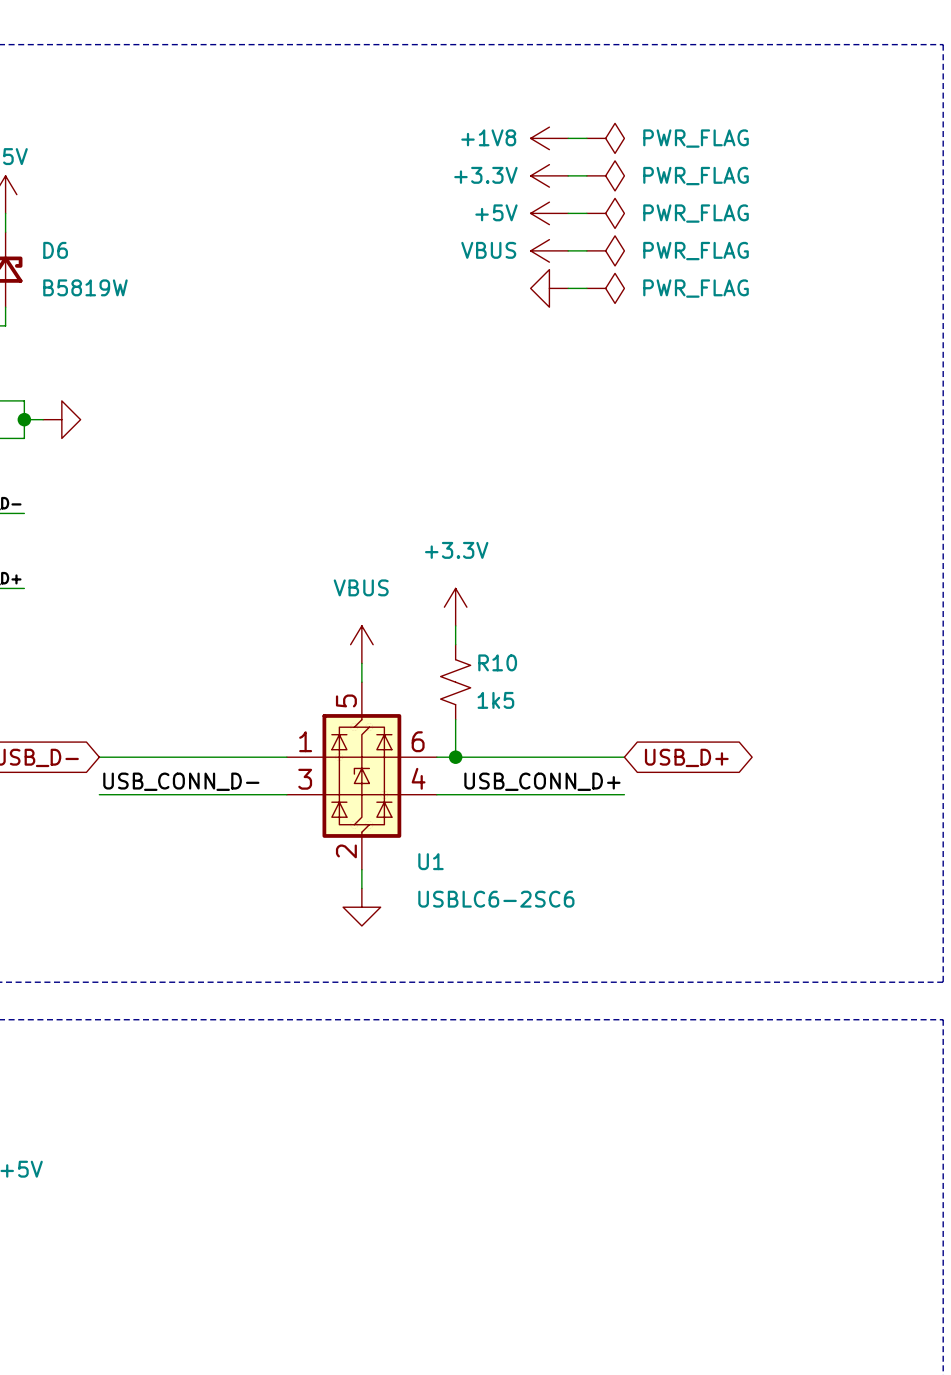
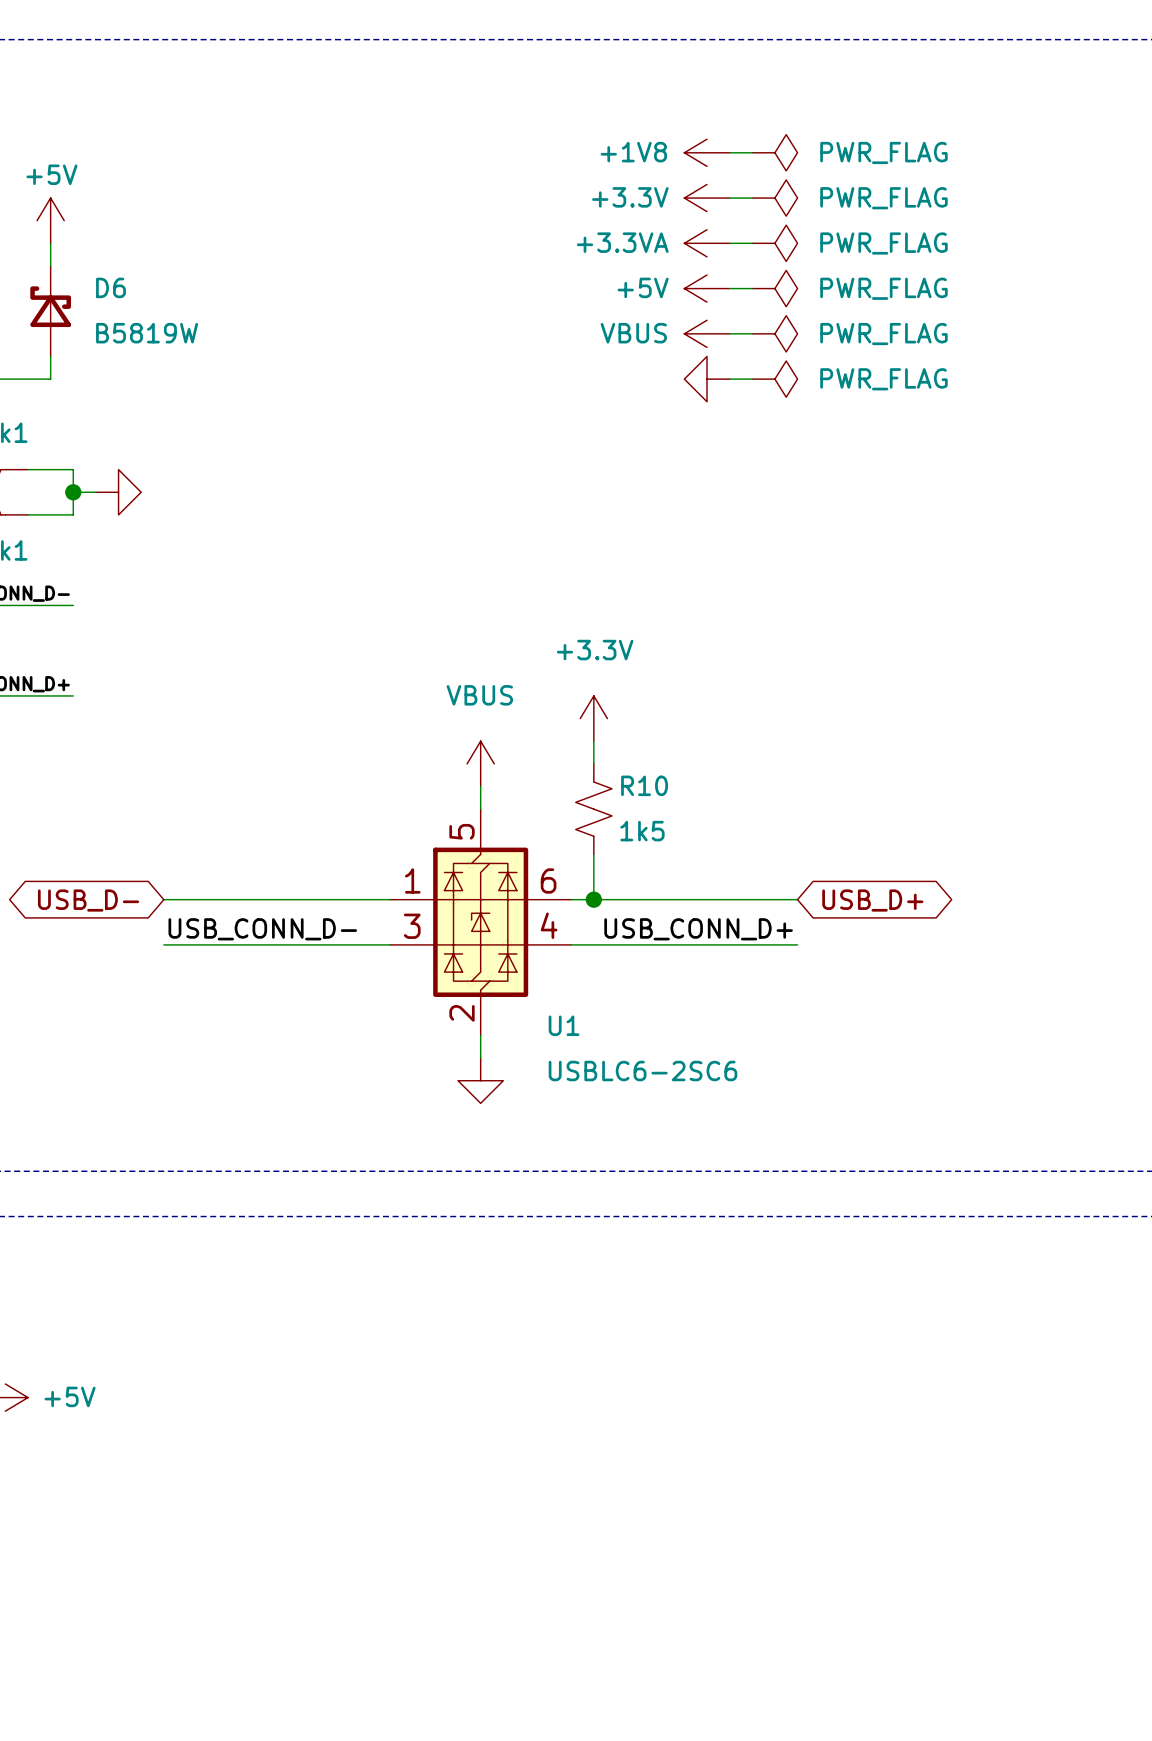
power symbol: +5V (549, 213) -> +3.3VA (707, 243)
power symbol: VBUS (549, 250) -> +5V (707, 288)
power symbol shape: [530, 269, 569, 308] -> [684, 320, 730, 348]
power symbol text: none -> VBUS (633, 333)
power symbol: none -> (707, 379)
wire: none -> (729, 379) (752, 379)
power symbol: none -> PWR_FLAG (774, 379)

